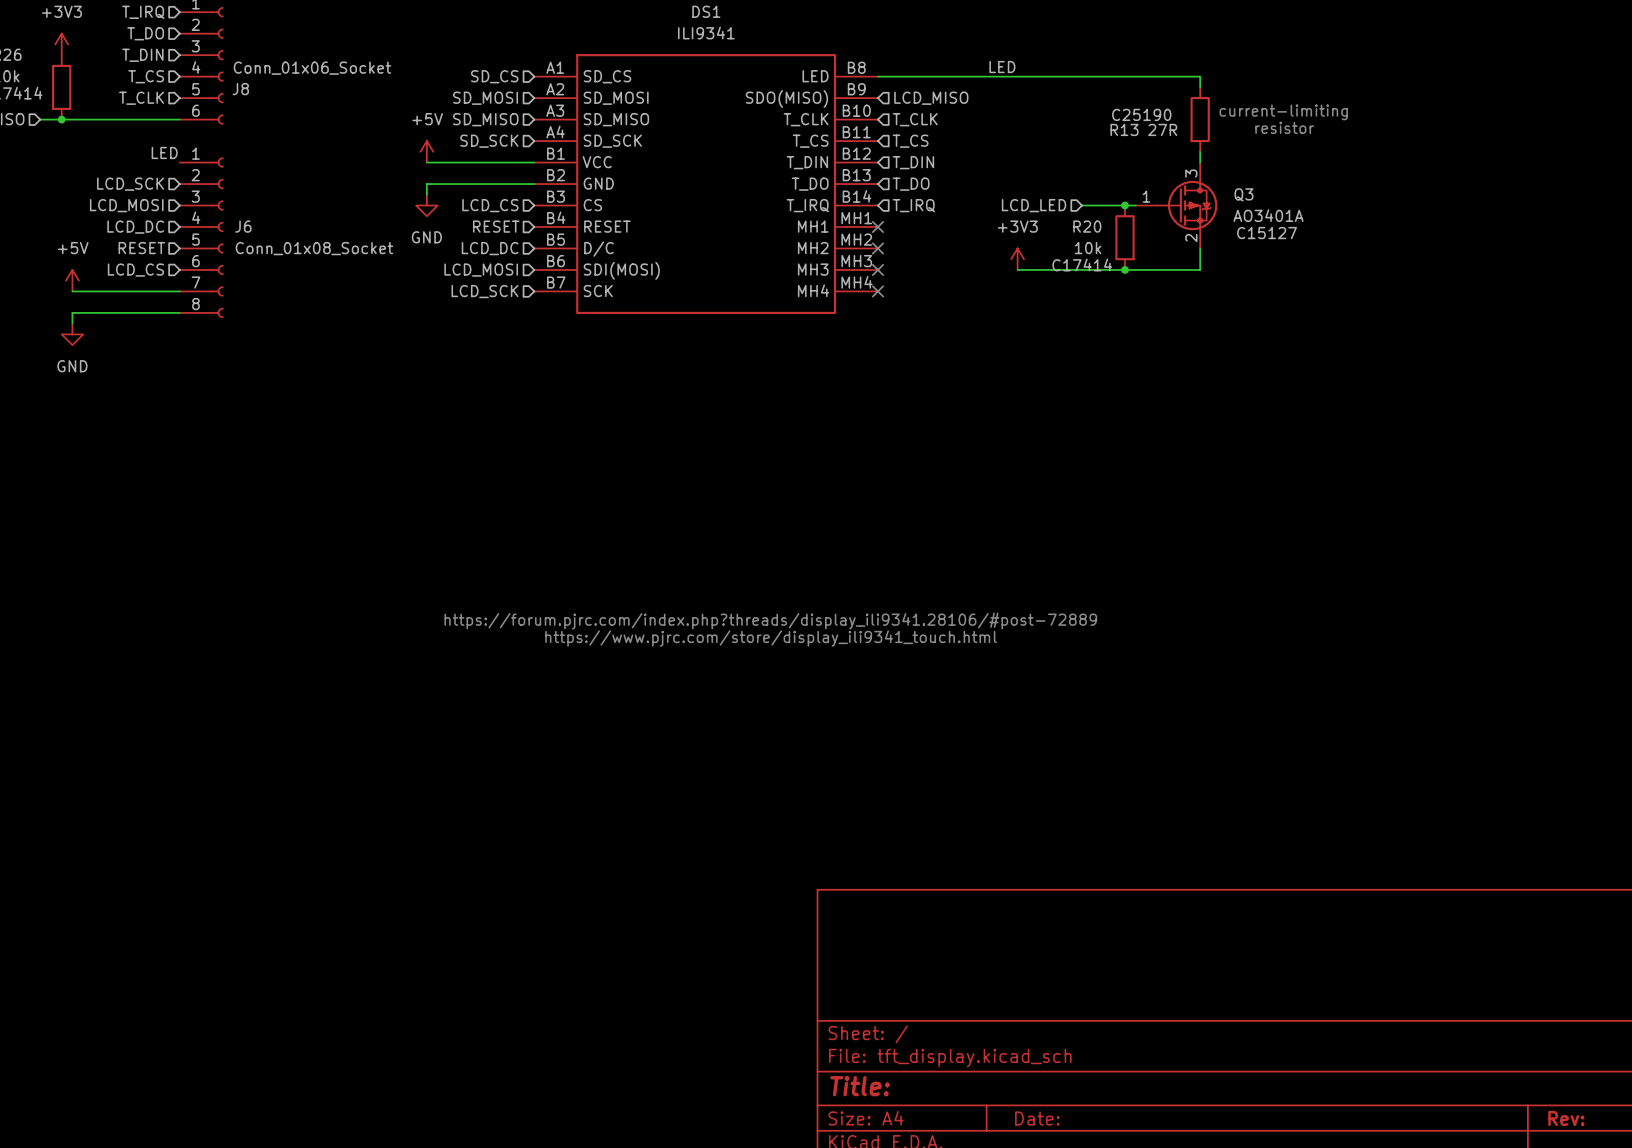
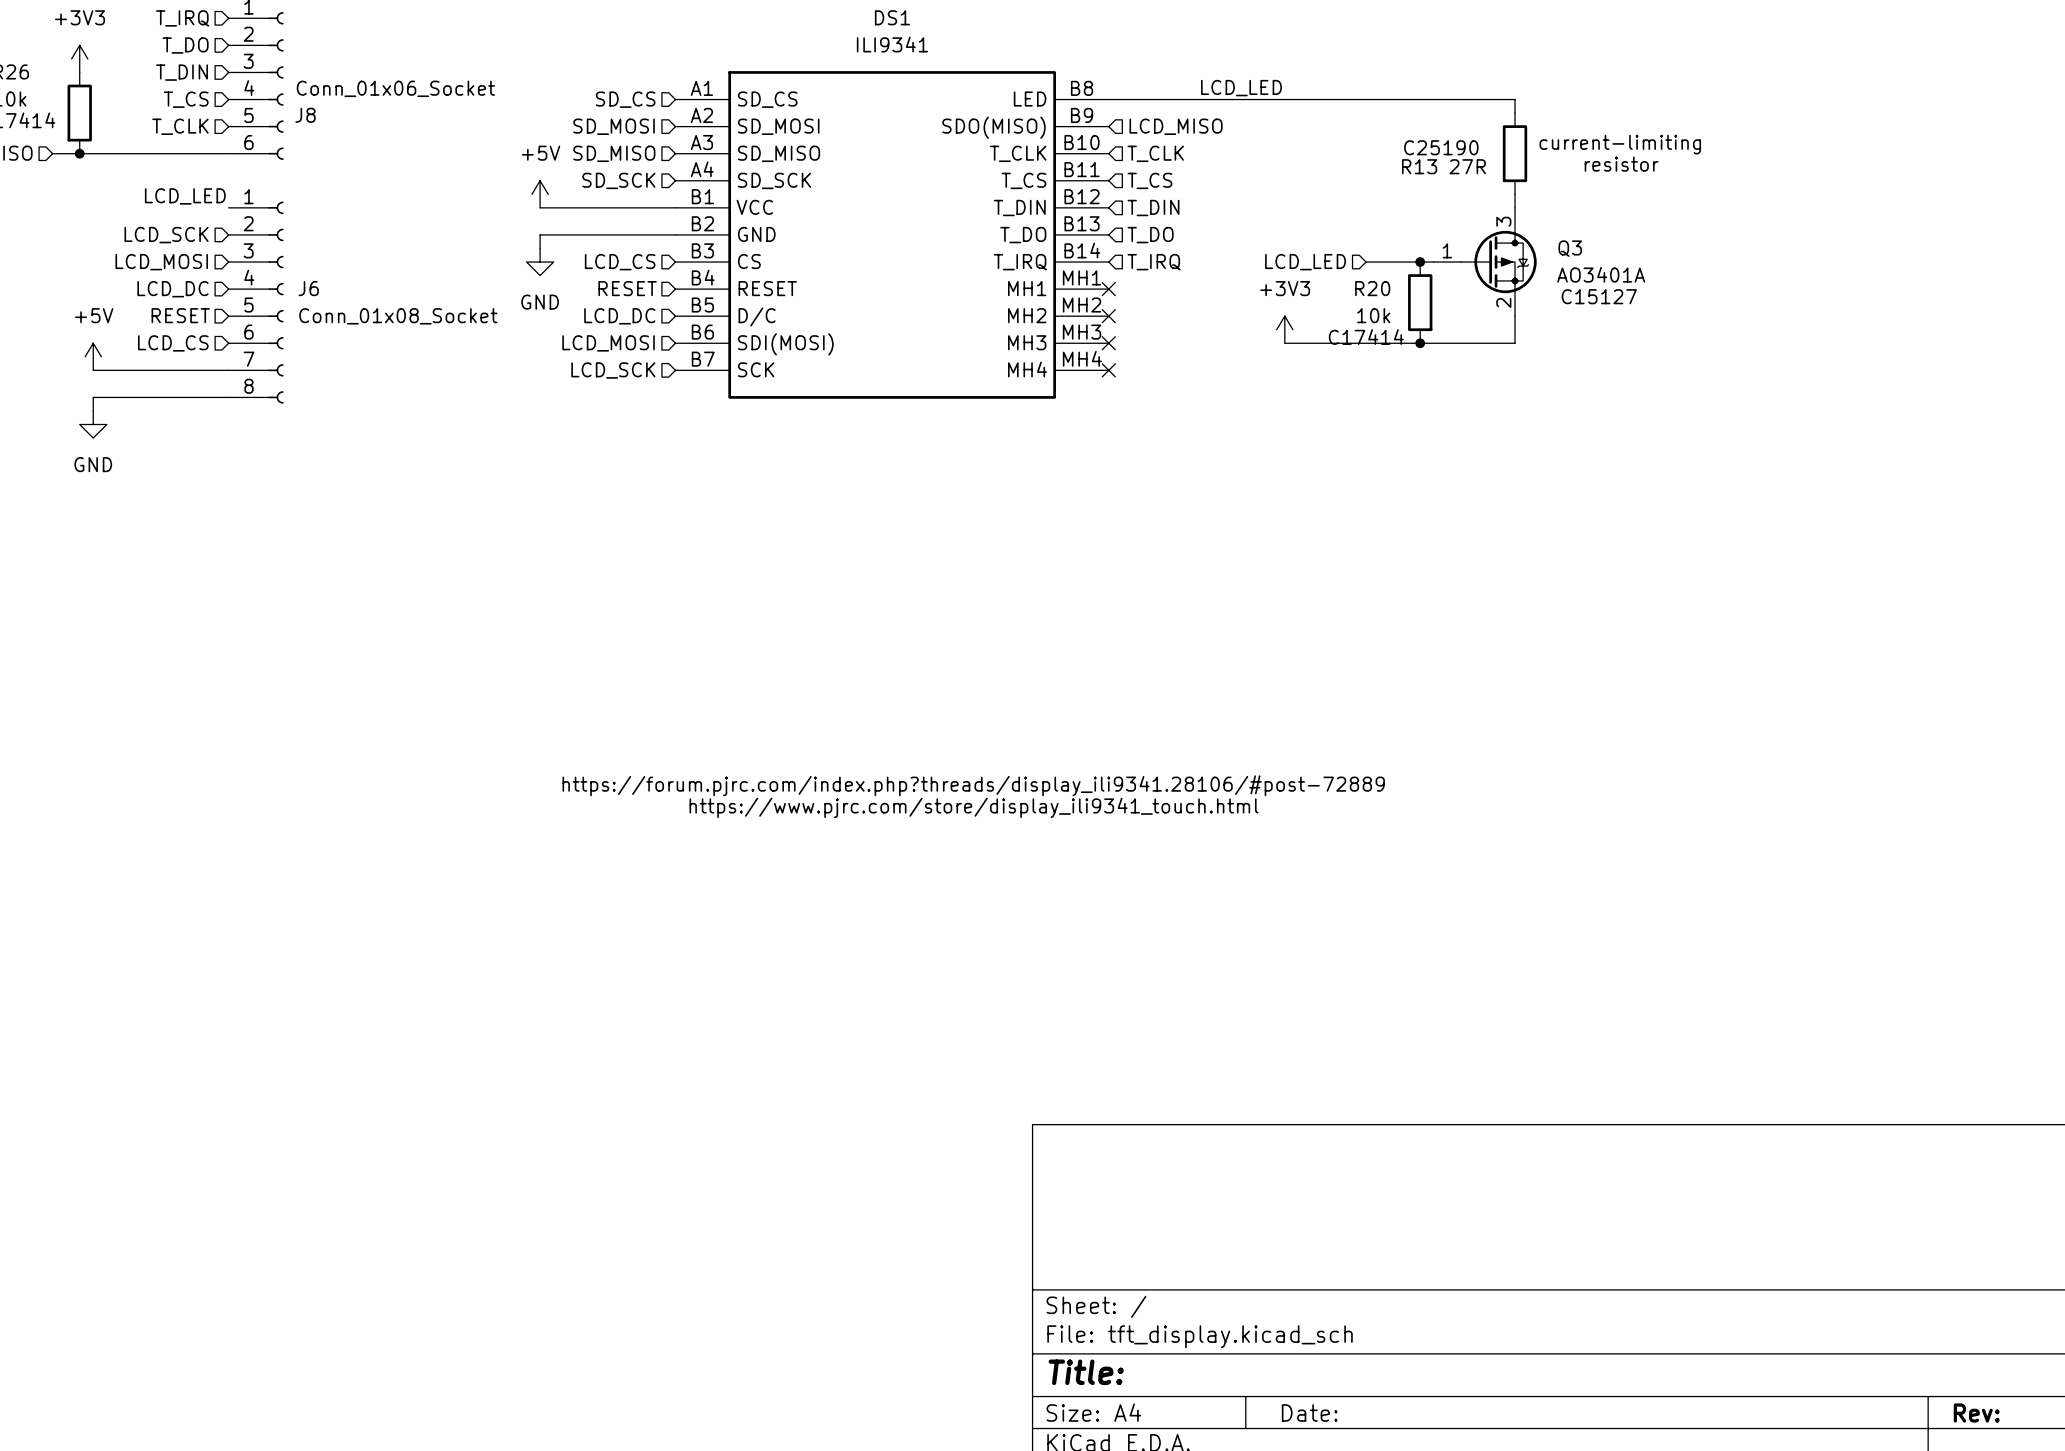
label: LED (1002, 67) -> LCD_LED (1241, 88)
label: LED (164, 152) -> LCD_LED (185, 196)

